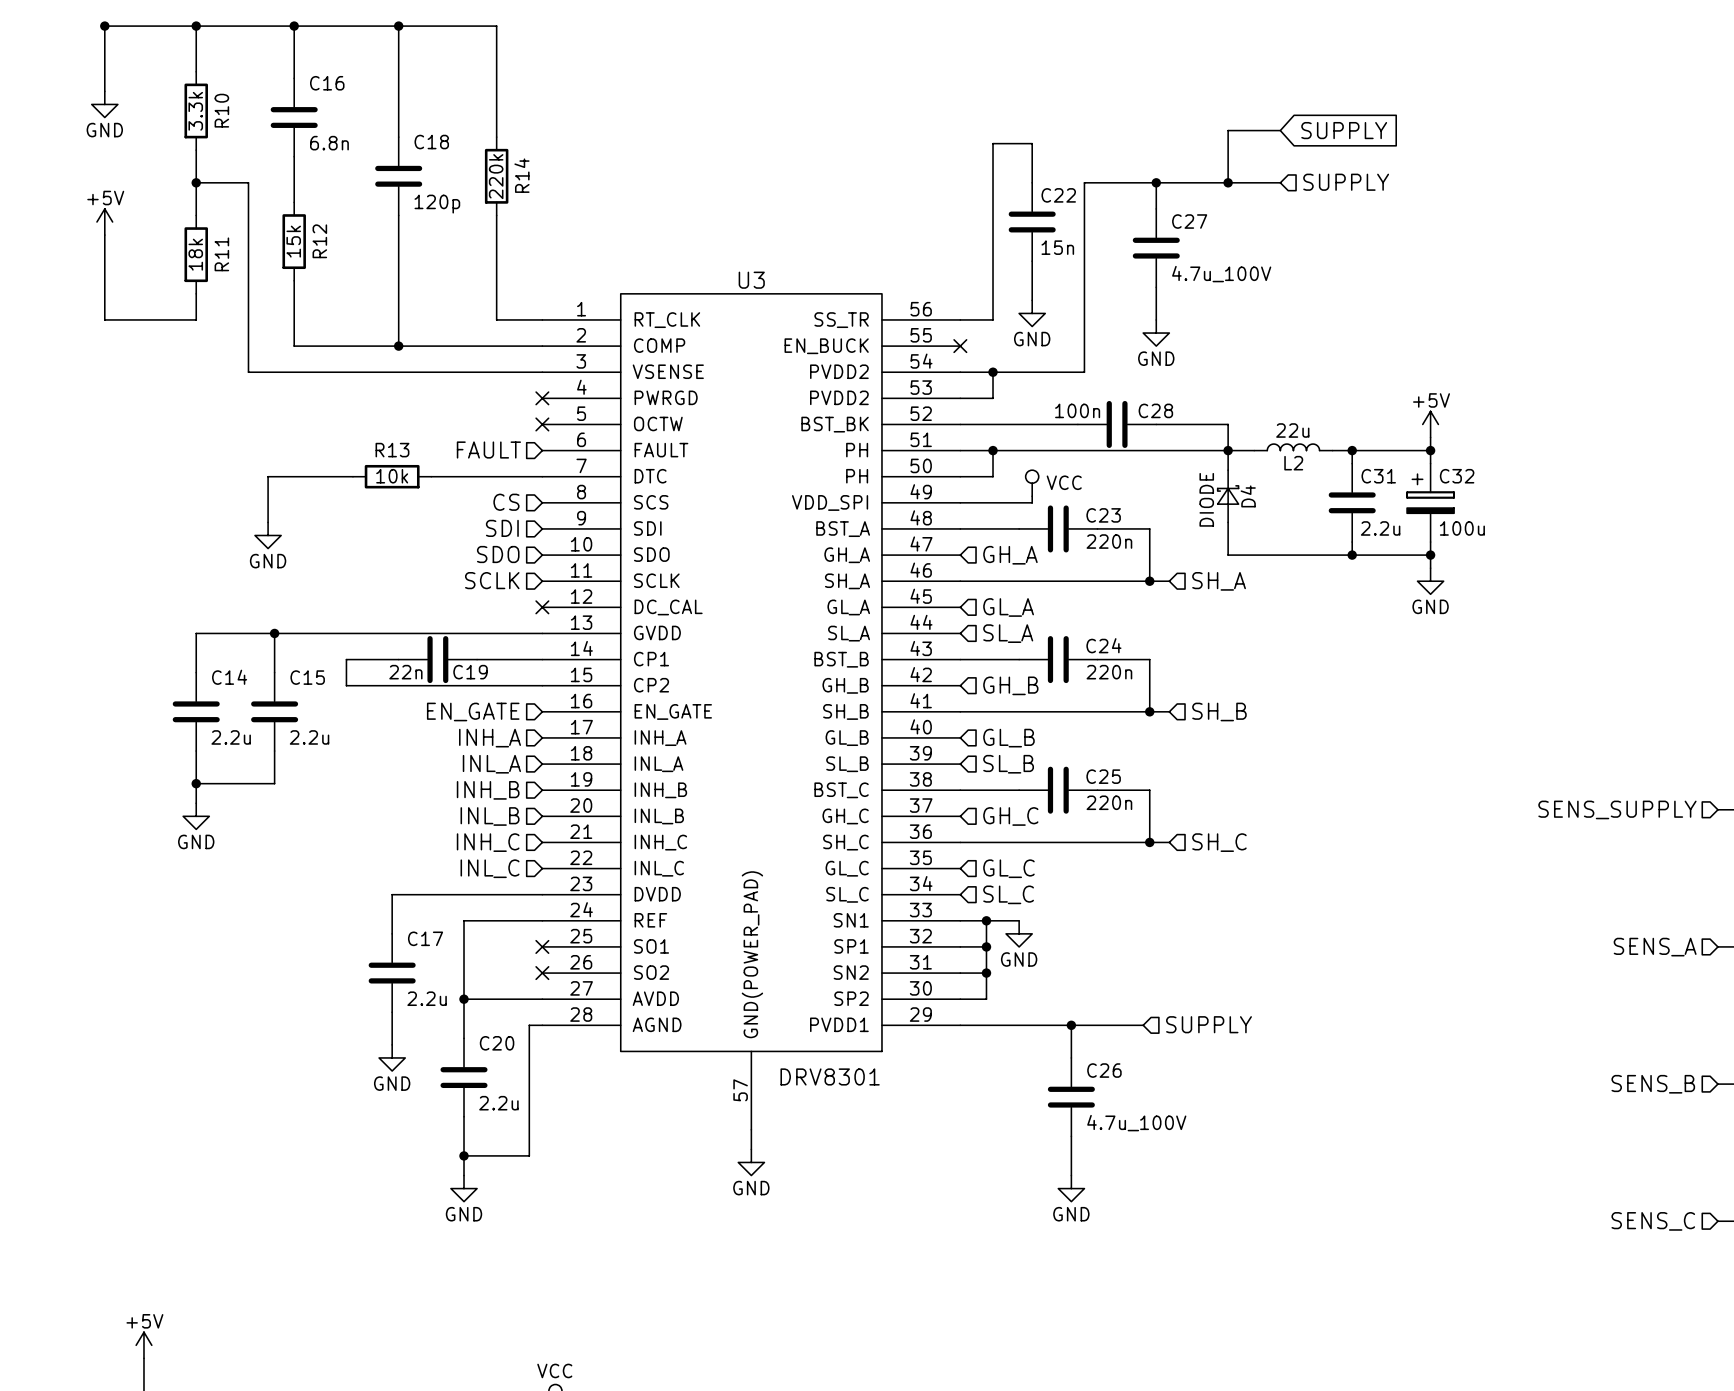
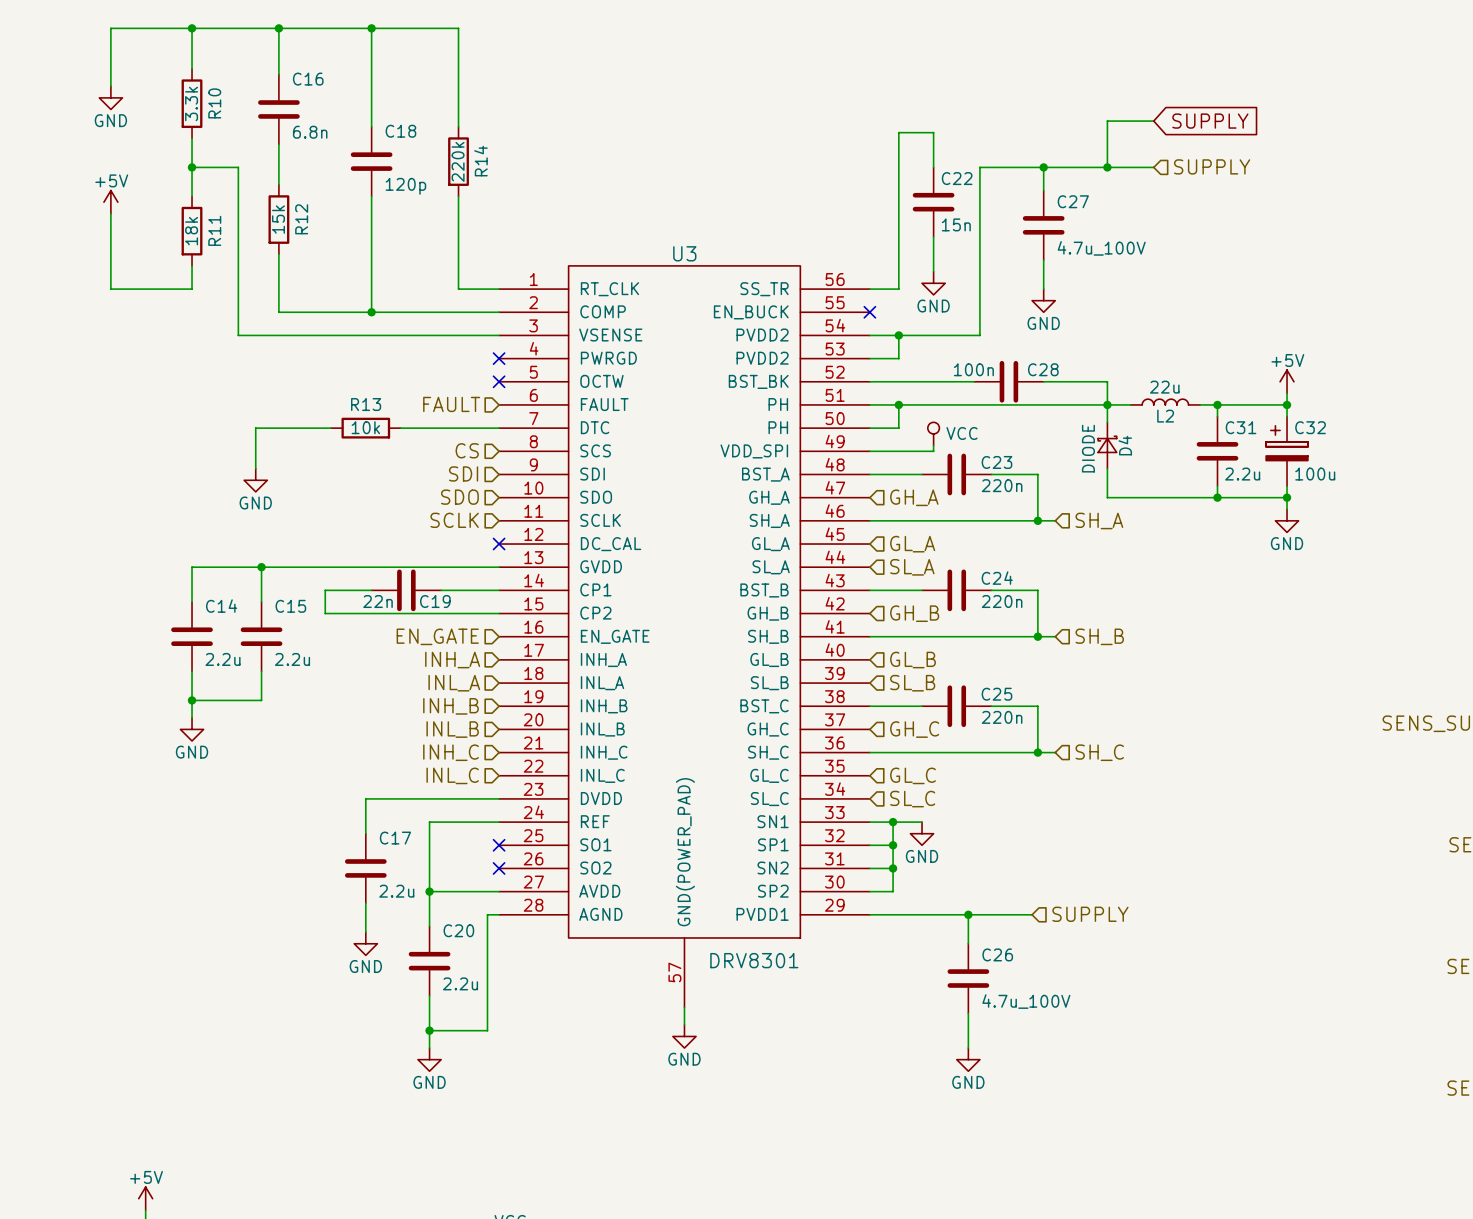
junction: (104, 26) -> none

